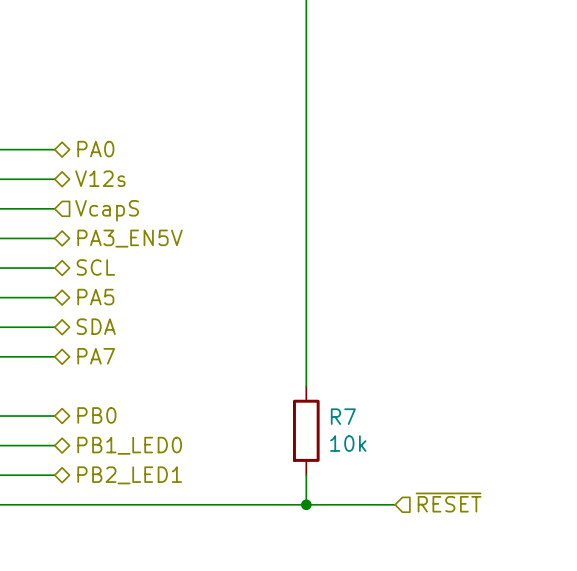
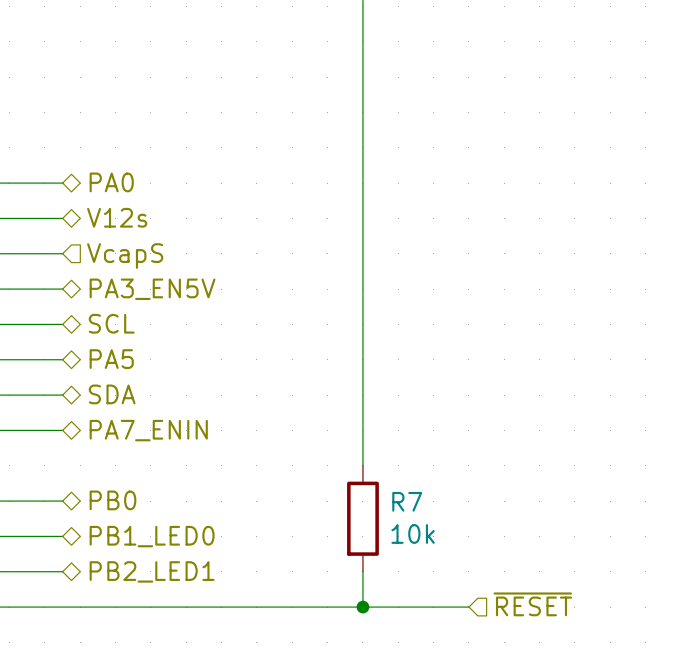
hierarchical label: PA7 (96, 356) -> PA7_ENIN (148, 430)

